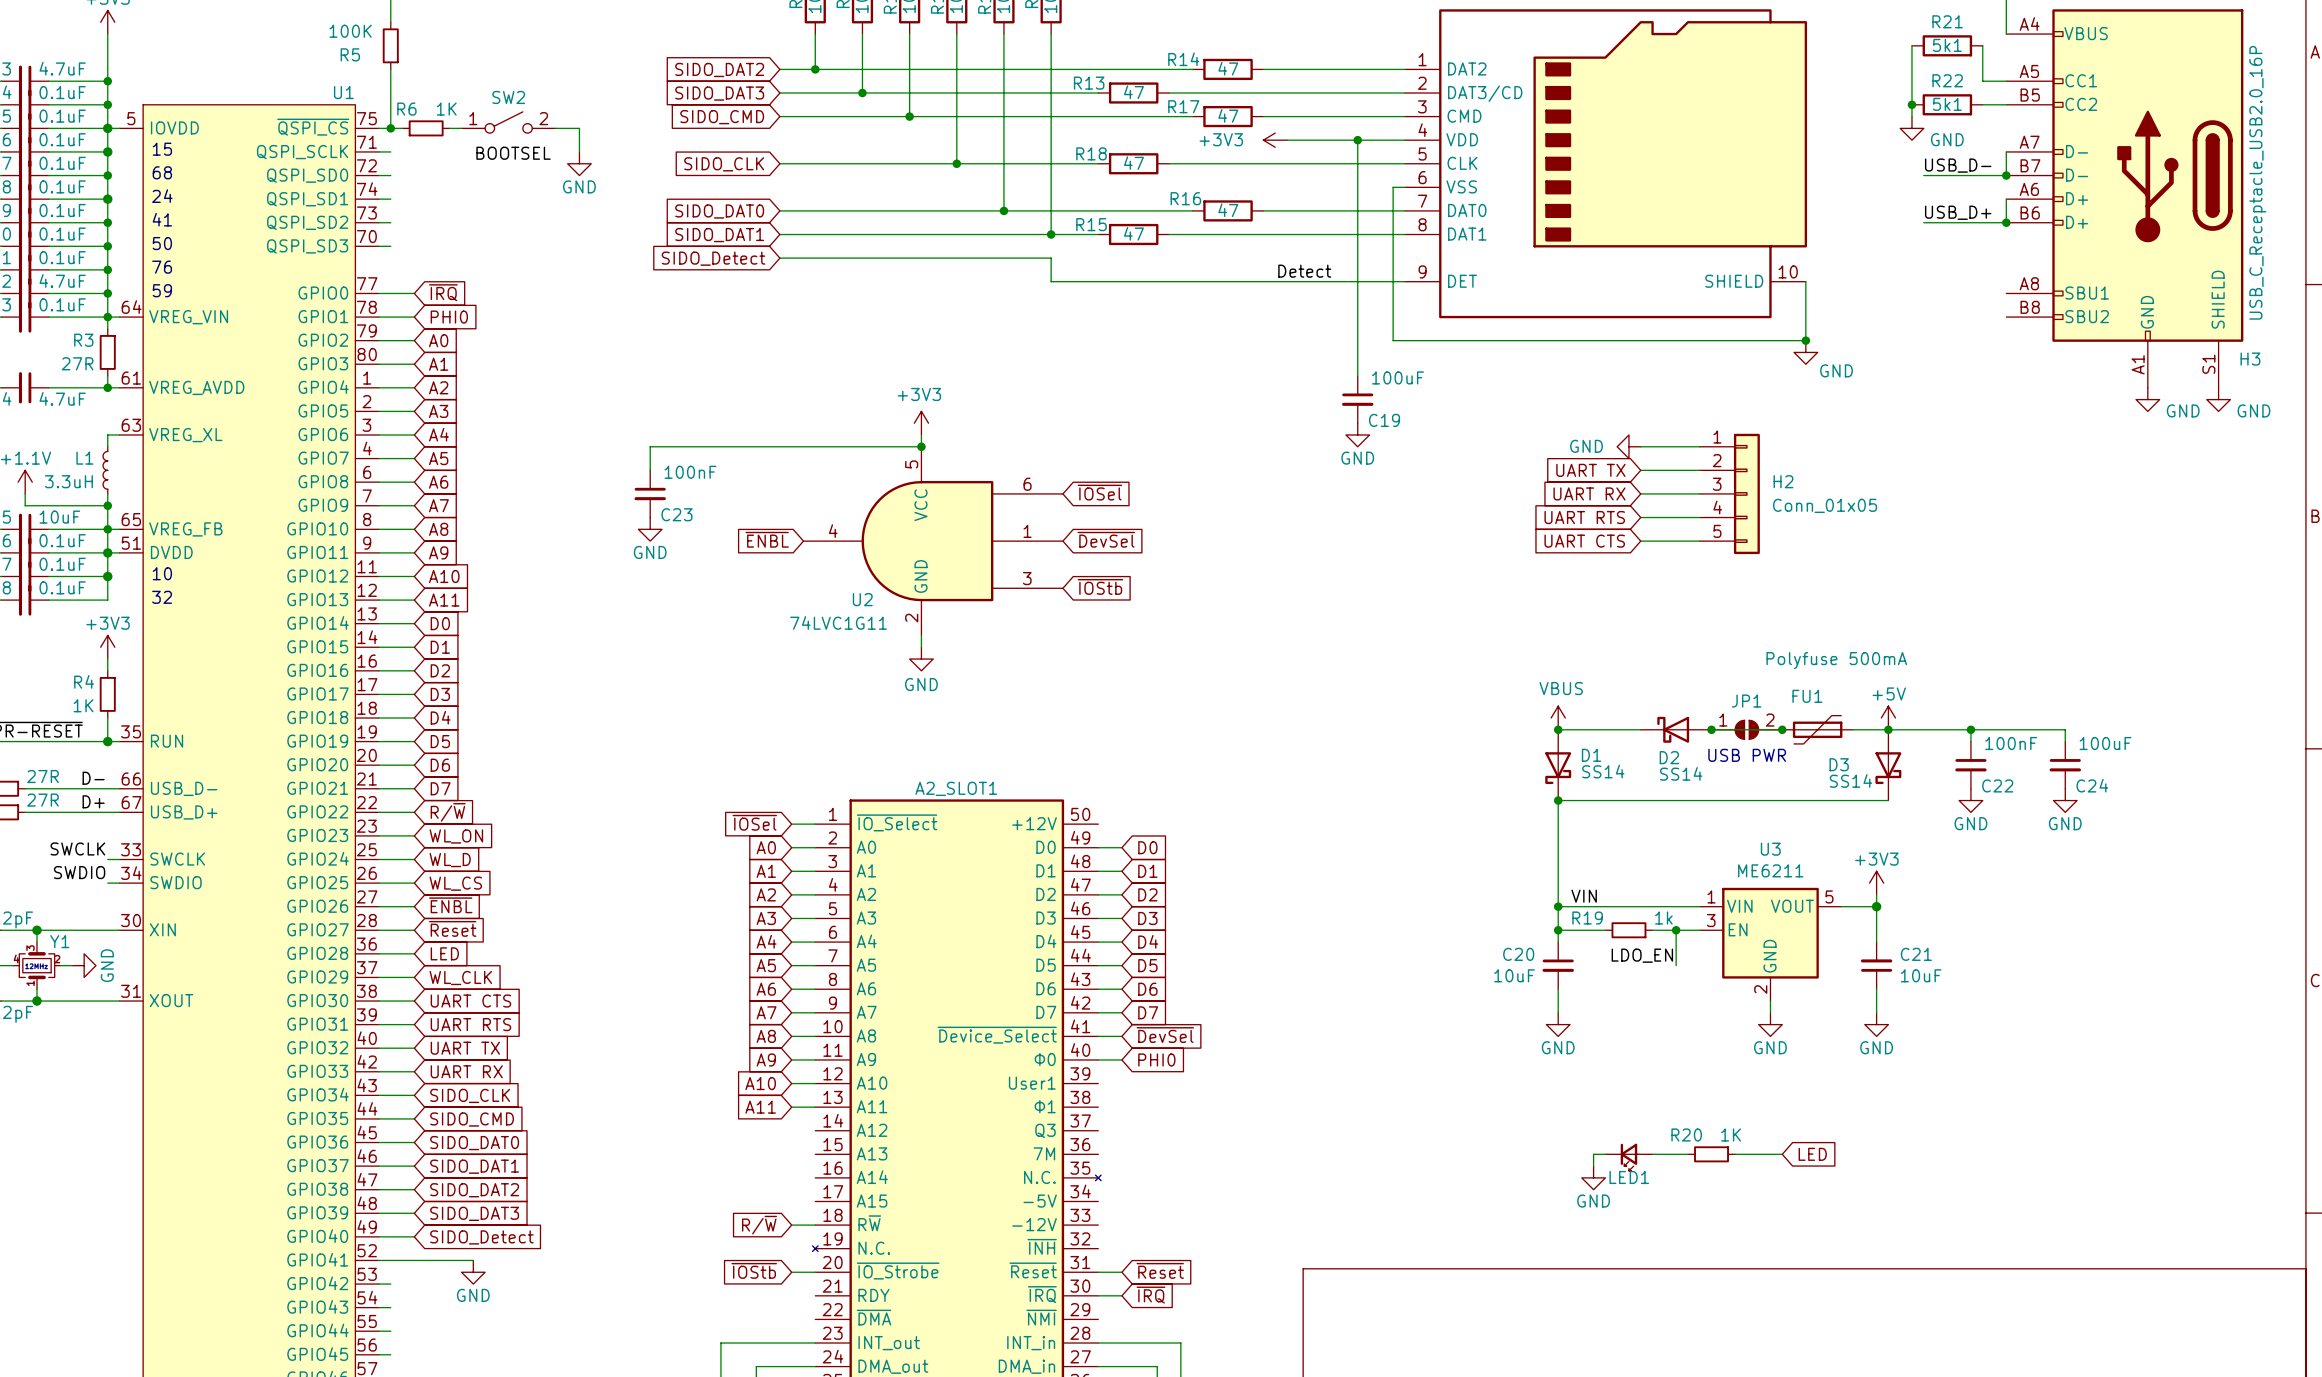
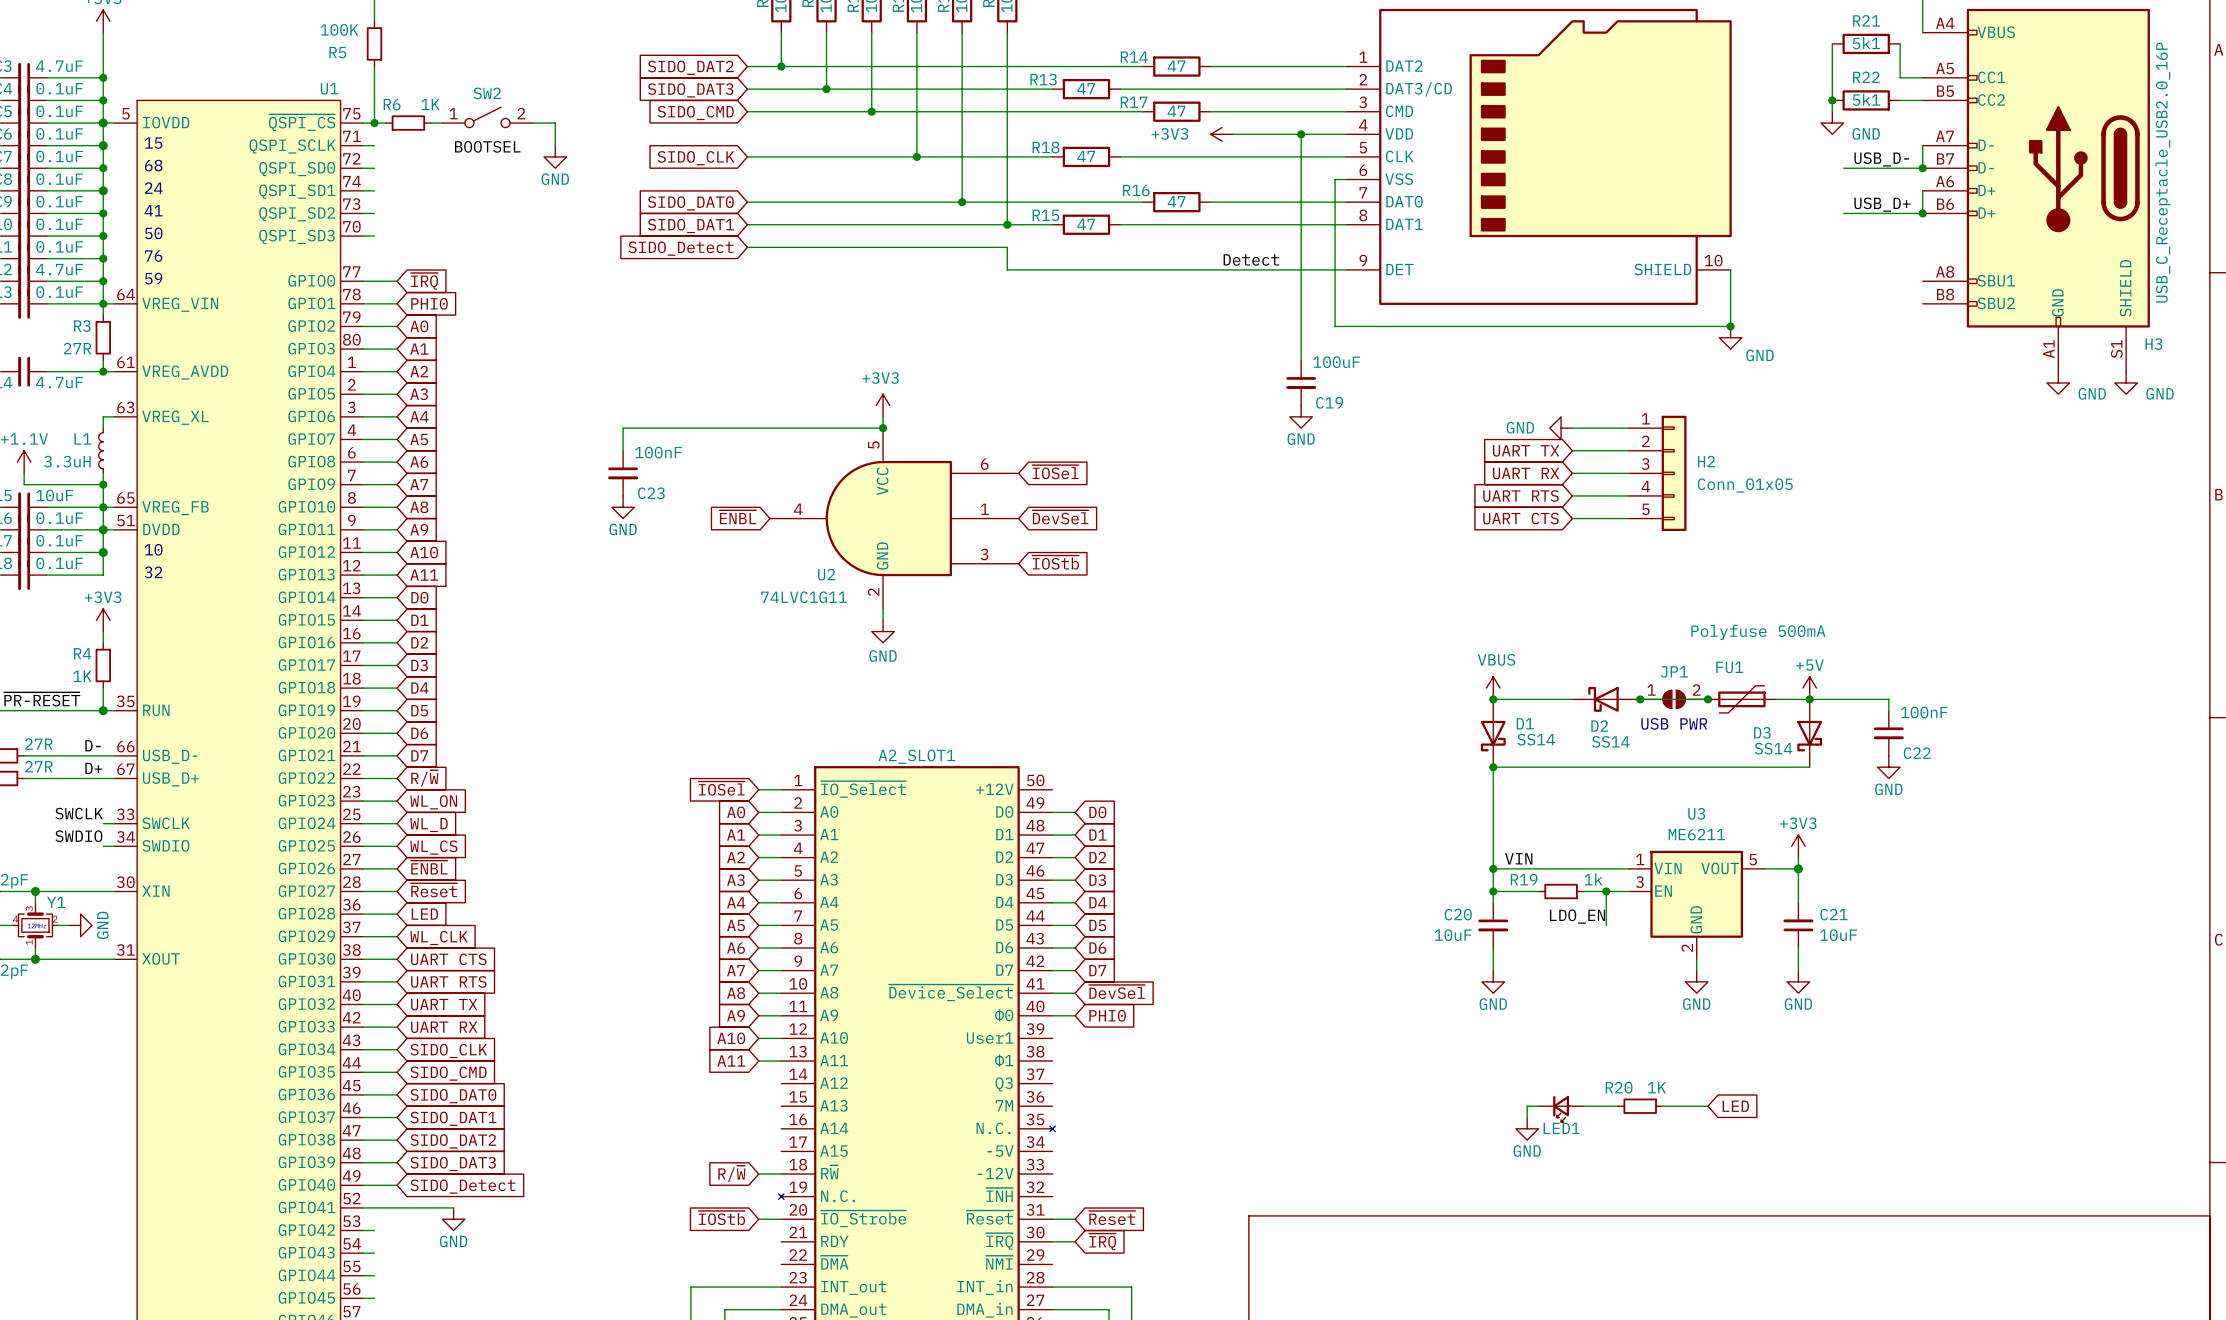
wire: (1970, 729) (2065, 729) (2065, 741) -> none
junction: (1970, 729) -> none
C24: 100uF (2065, 765) -> none
power symbol: GND (2065, 800) -> none

